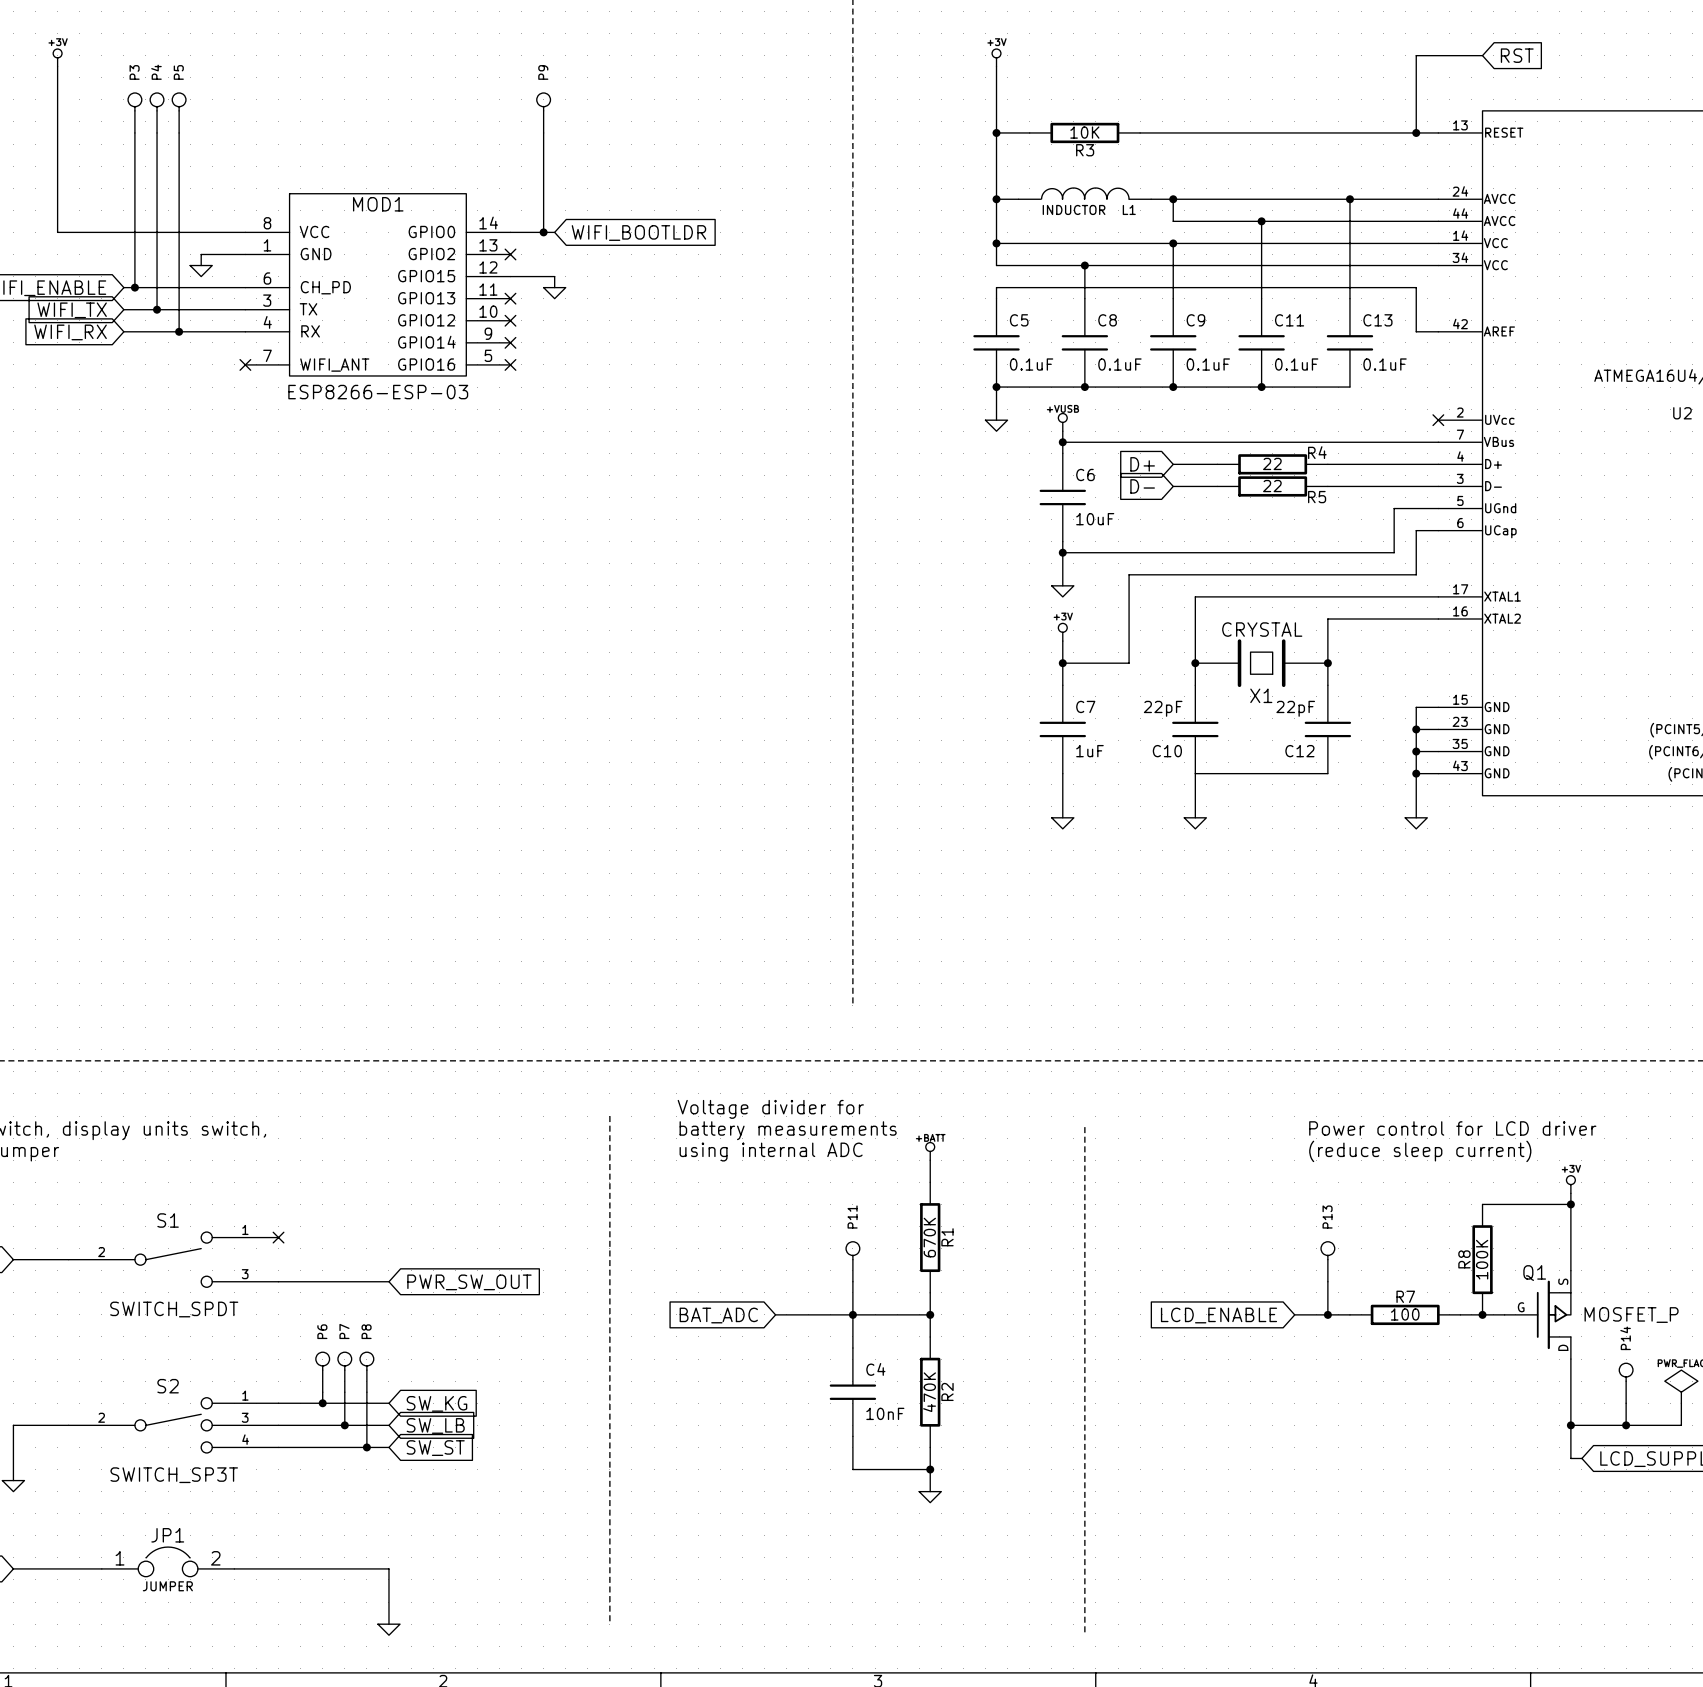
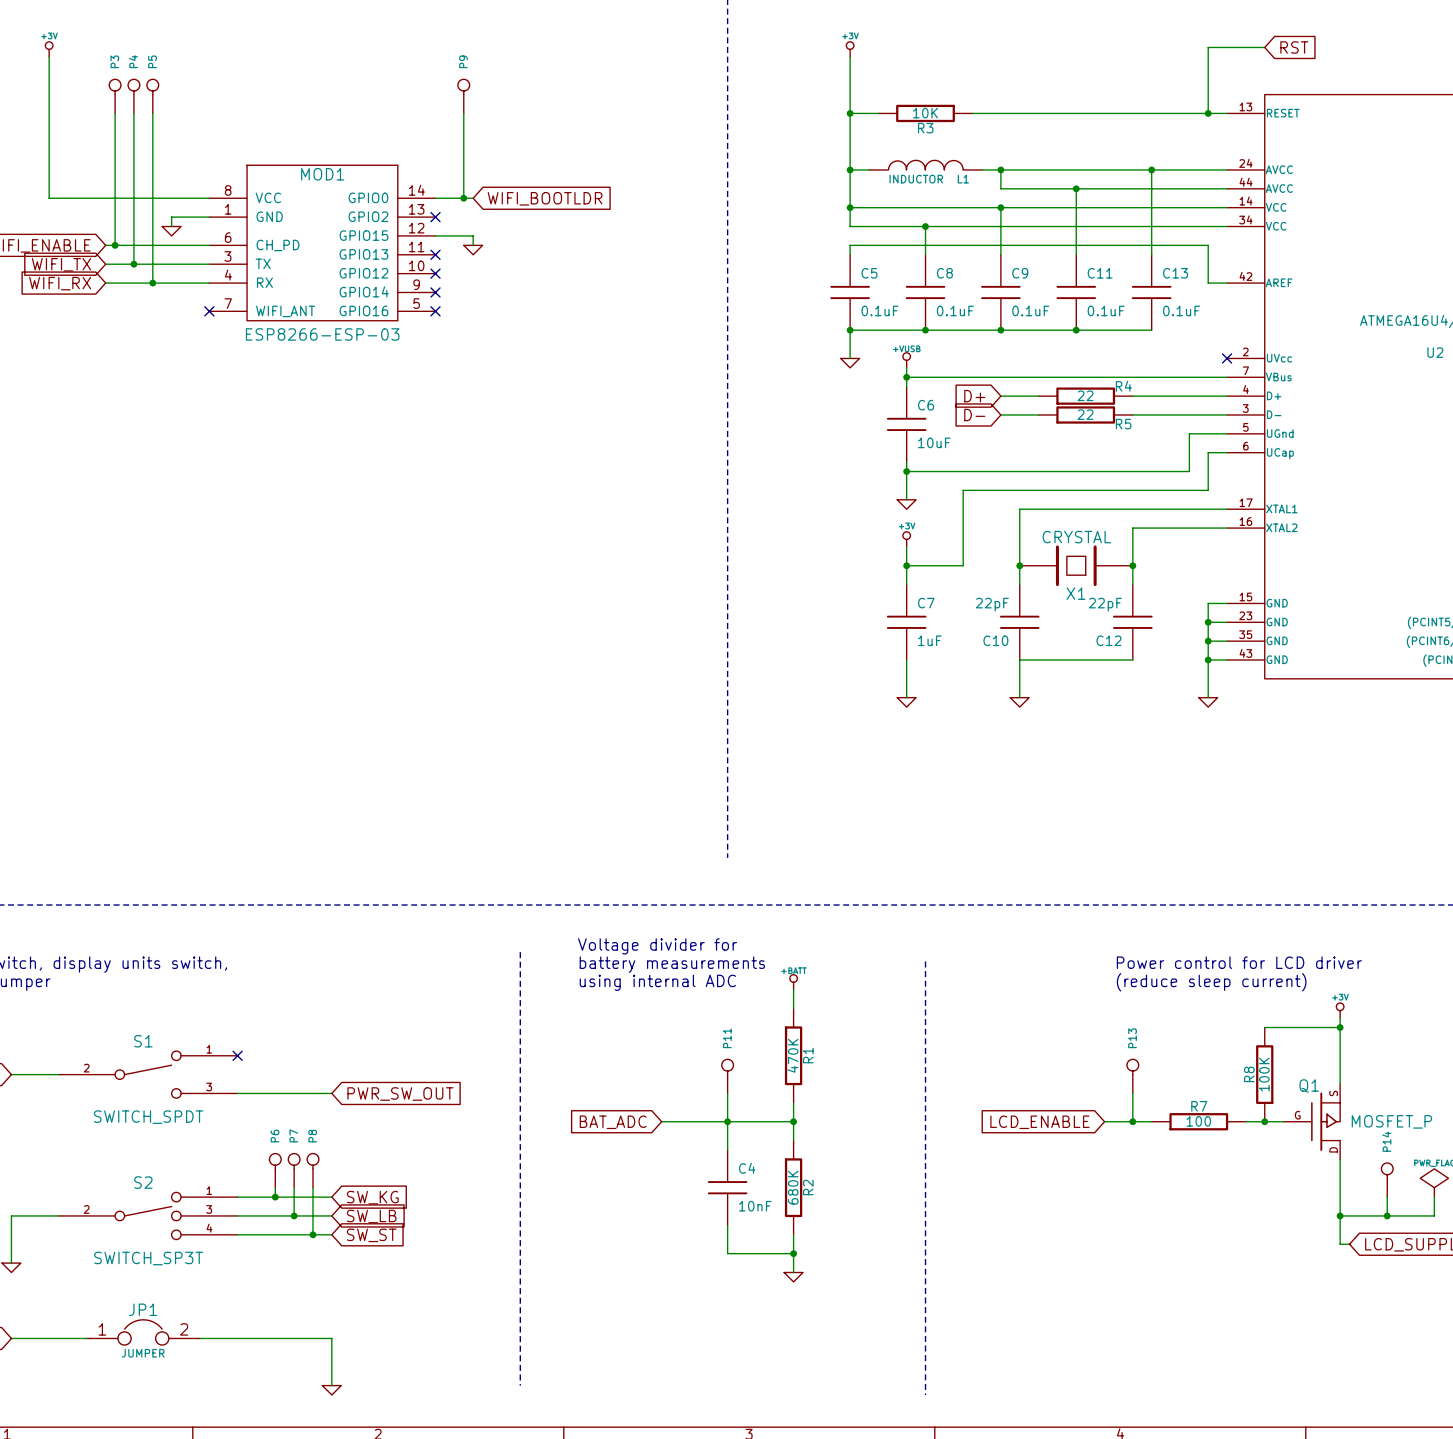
R1 value: 670K (929, 1237) -> 470K (793, 1055)
R2 value: 470K (929, 1392) -> 680K (793, 1187)

